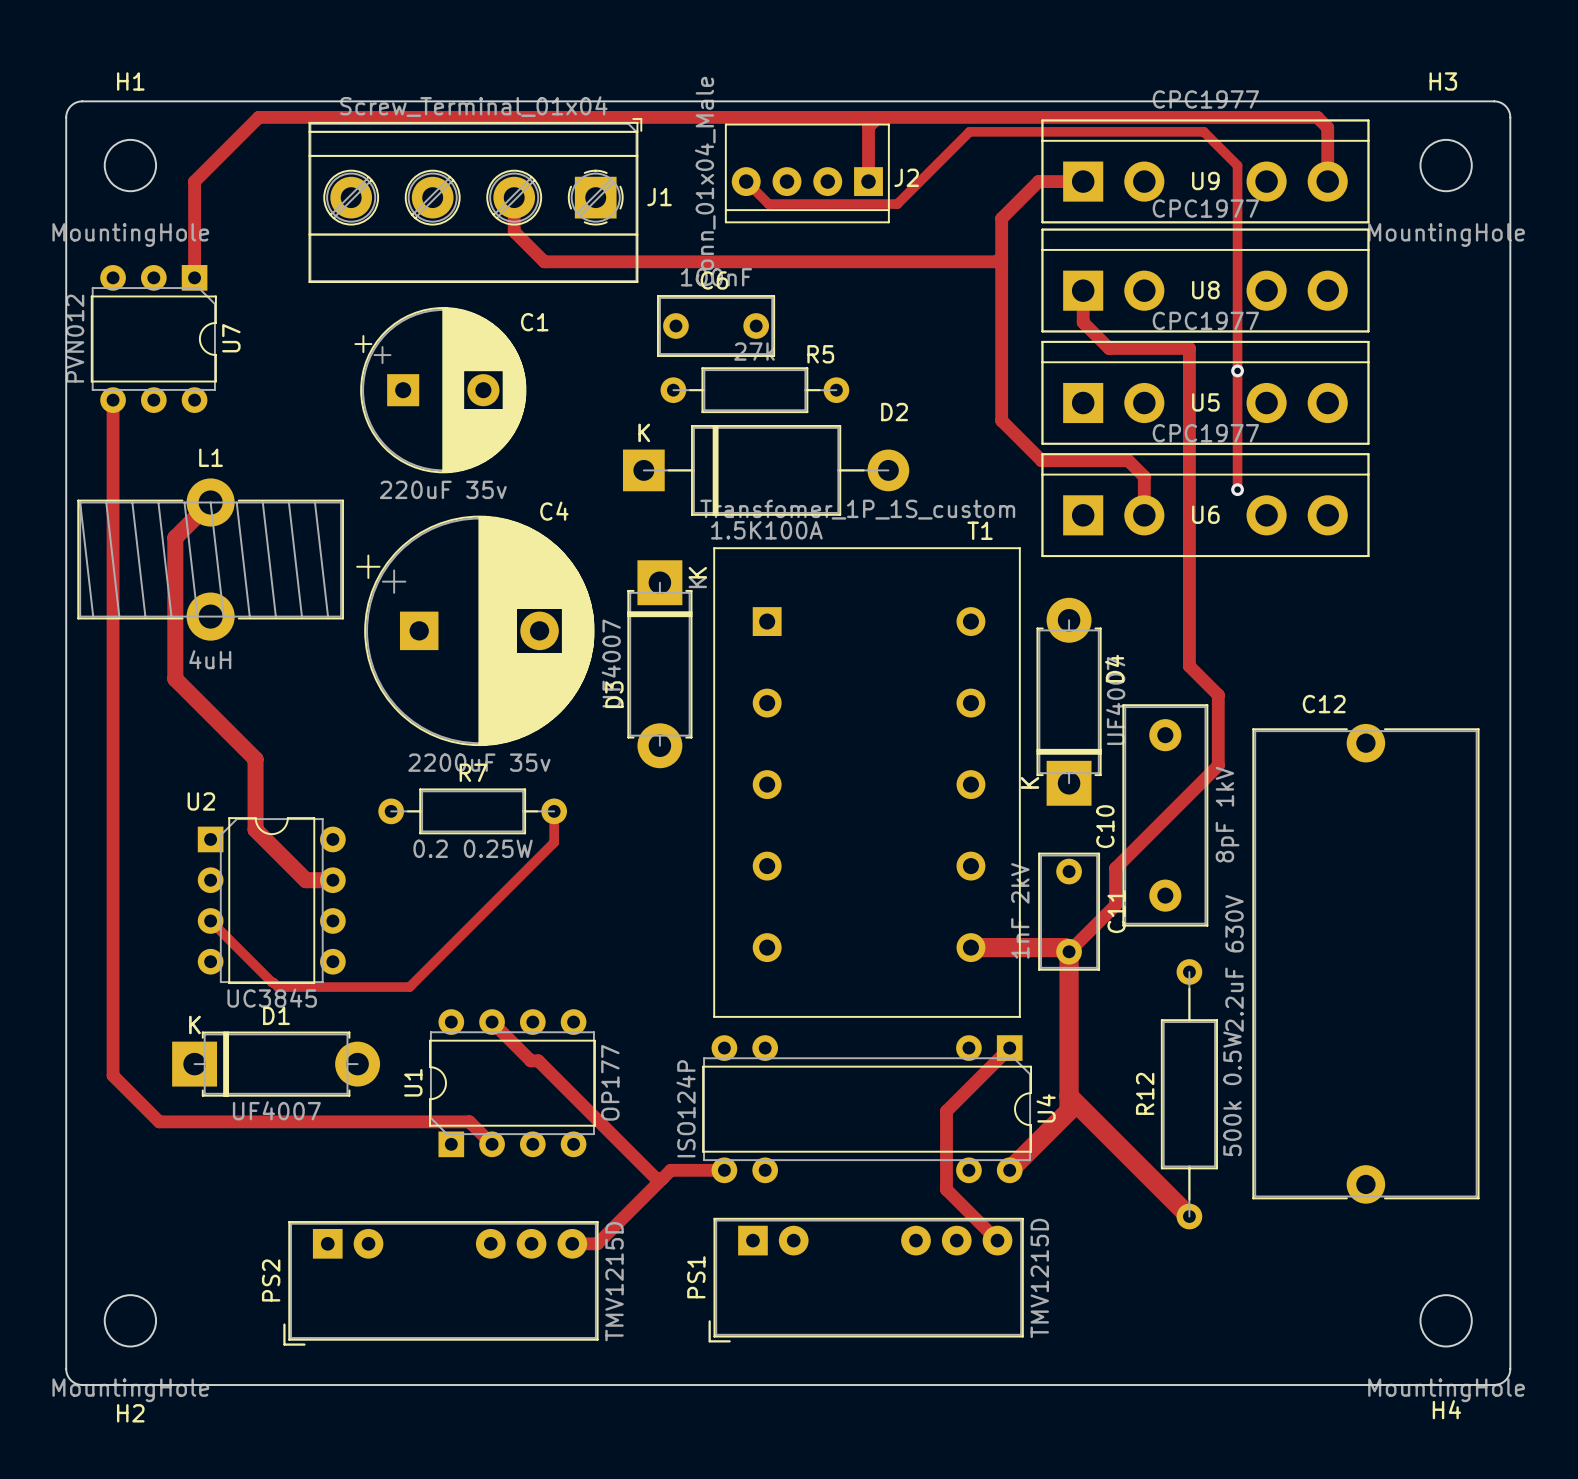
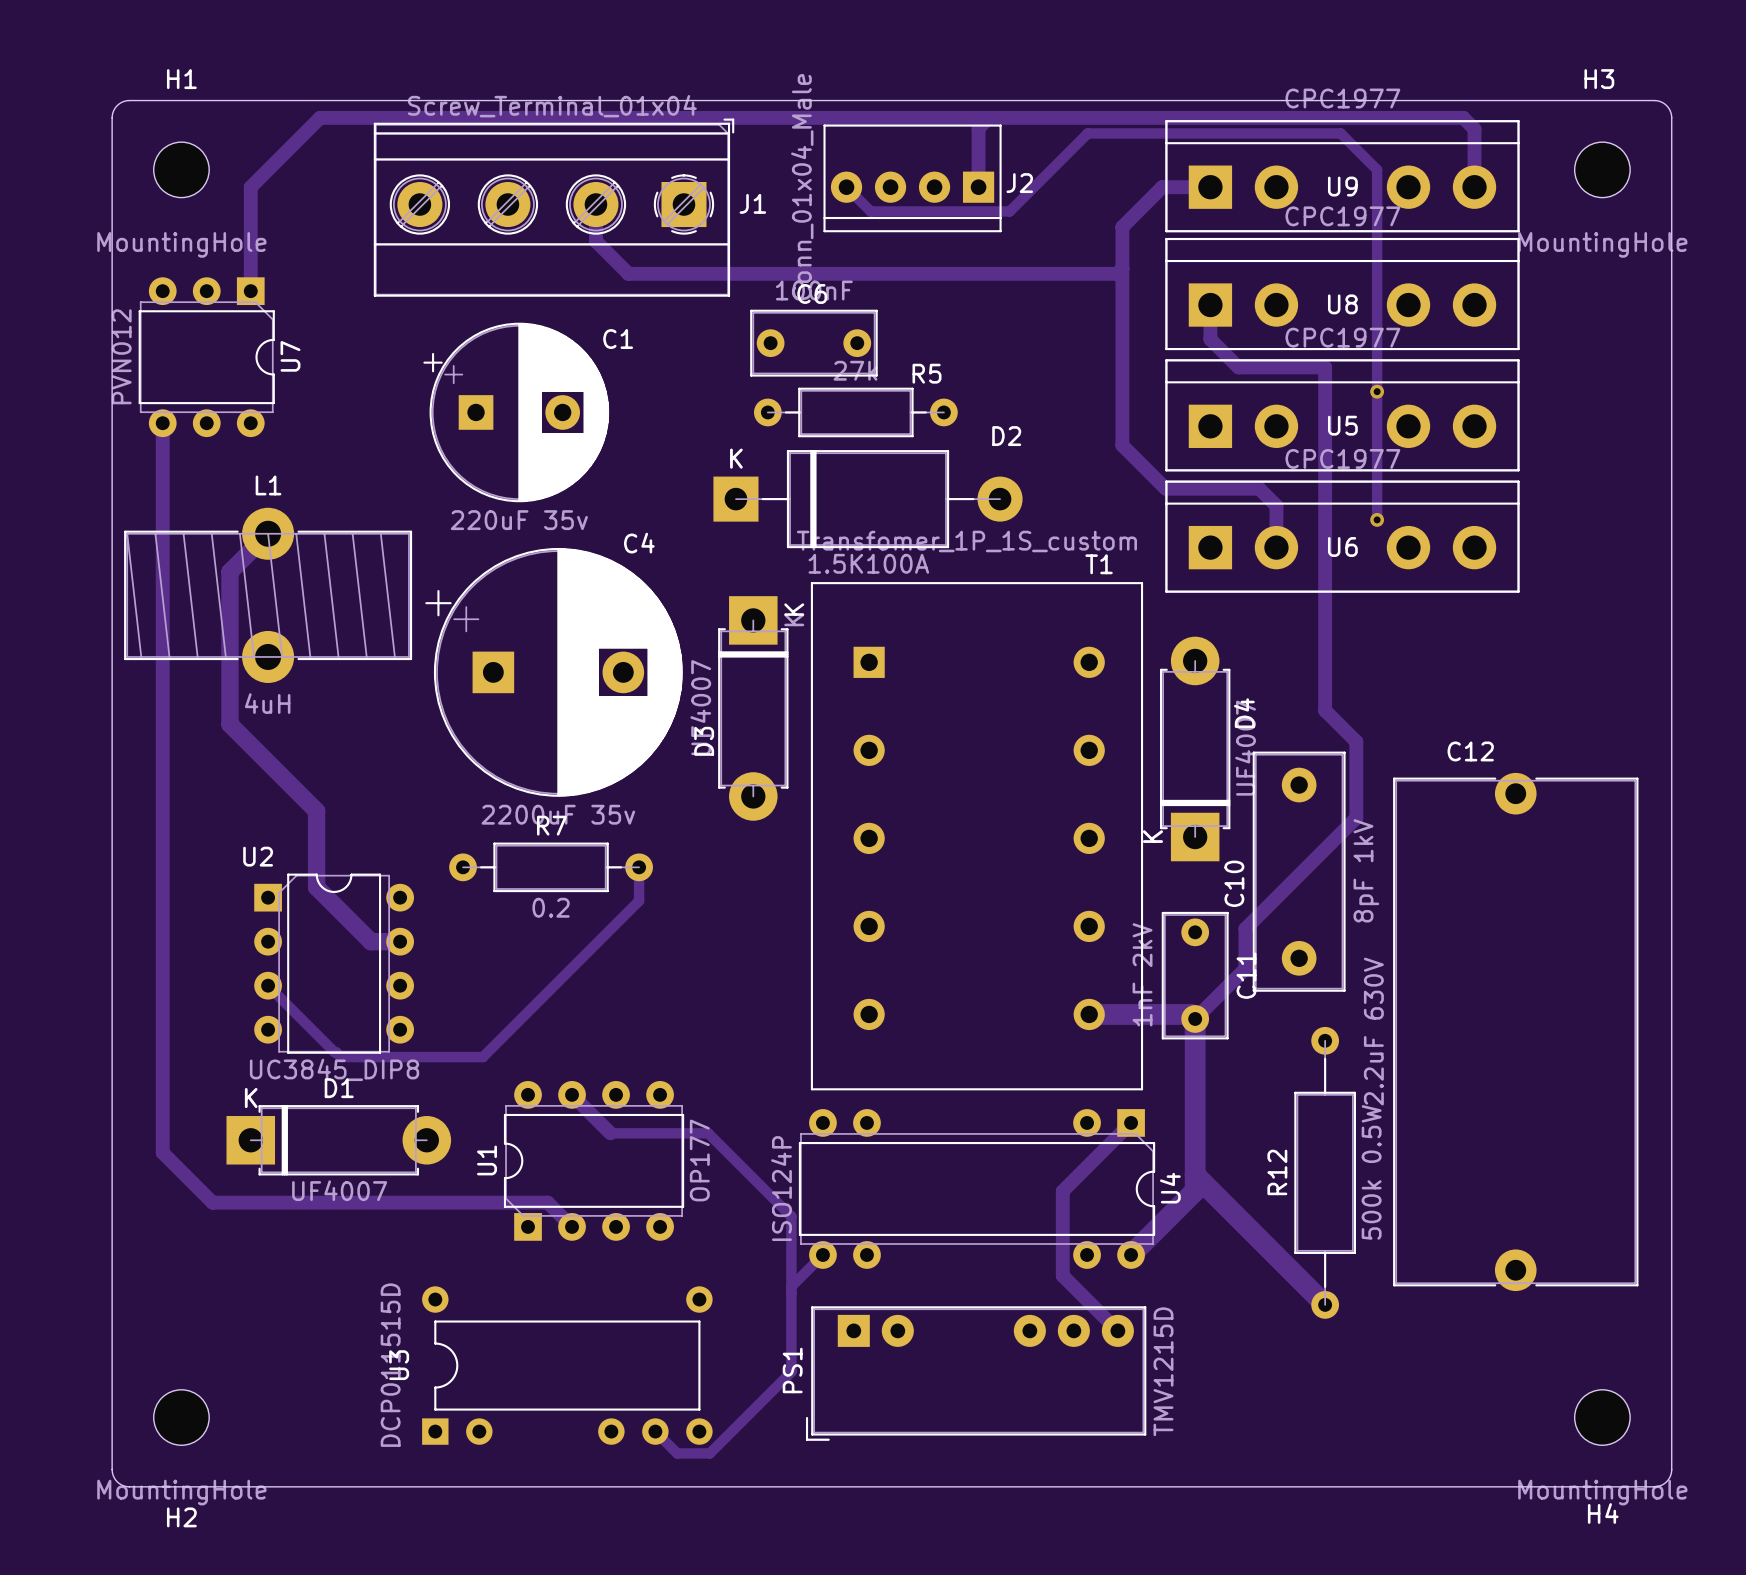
R7 value: 0.2 0.25W (473, 848) -> 0.2 (551, 907)
U2 value: UC3845 (272, 998) -> UC3845_DIP8 (334, 1069)
track: (527, 1057) (530, 1060) (538, 1060) (656, 1178) (662, 1178) -> (610, 1133) (708, 1133) (791, 1216) (791, 1371) (709, 1453) (677, 1453) (655, 1431)
track: (724, 1170) (670, 1170) (597, 1243) (572, 1243) -> (822, 1254) (791, 1286)
U3: none -> DCP011515D (567, 1365)
PS2: TMV1215D (441, 1283) -> none

